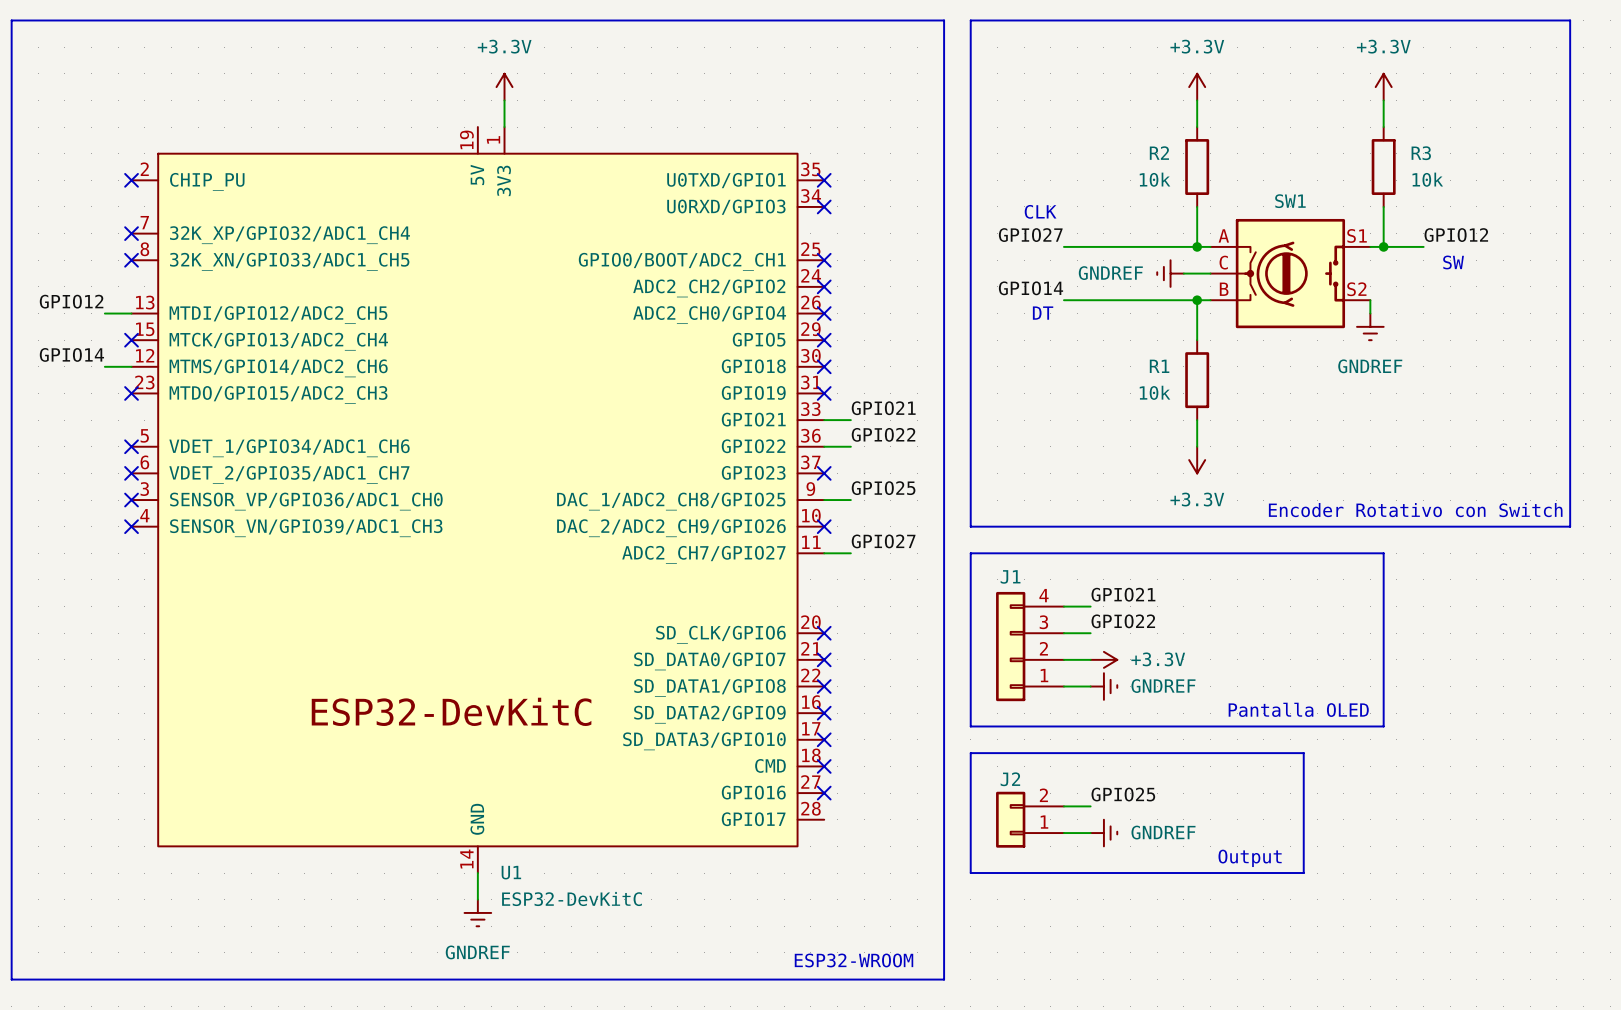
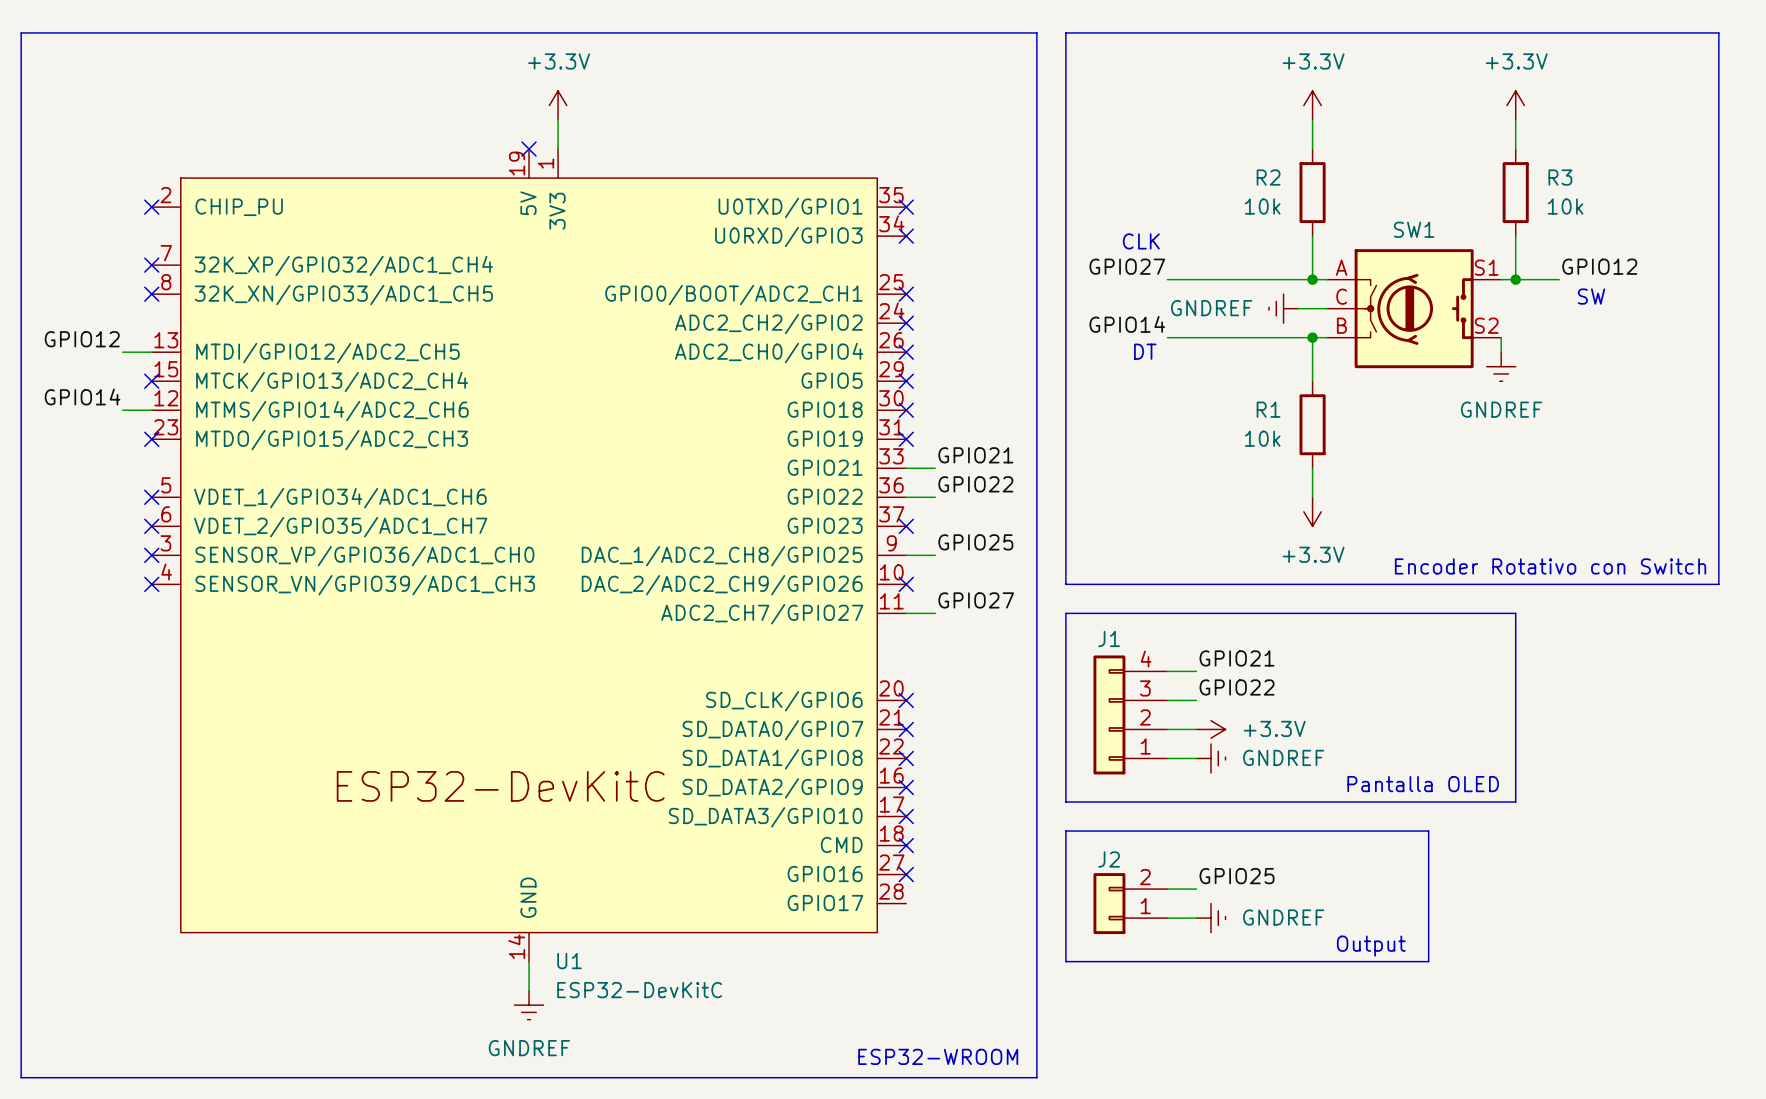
no-connect mark: none -> (529, 149)

